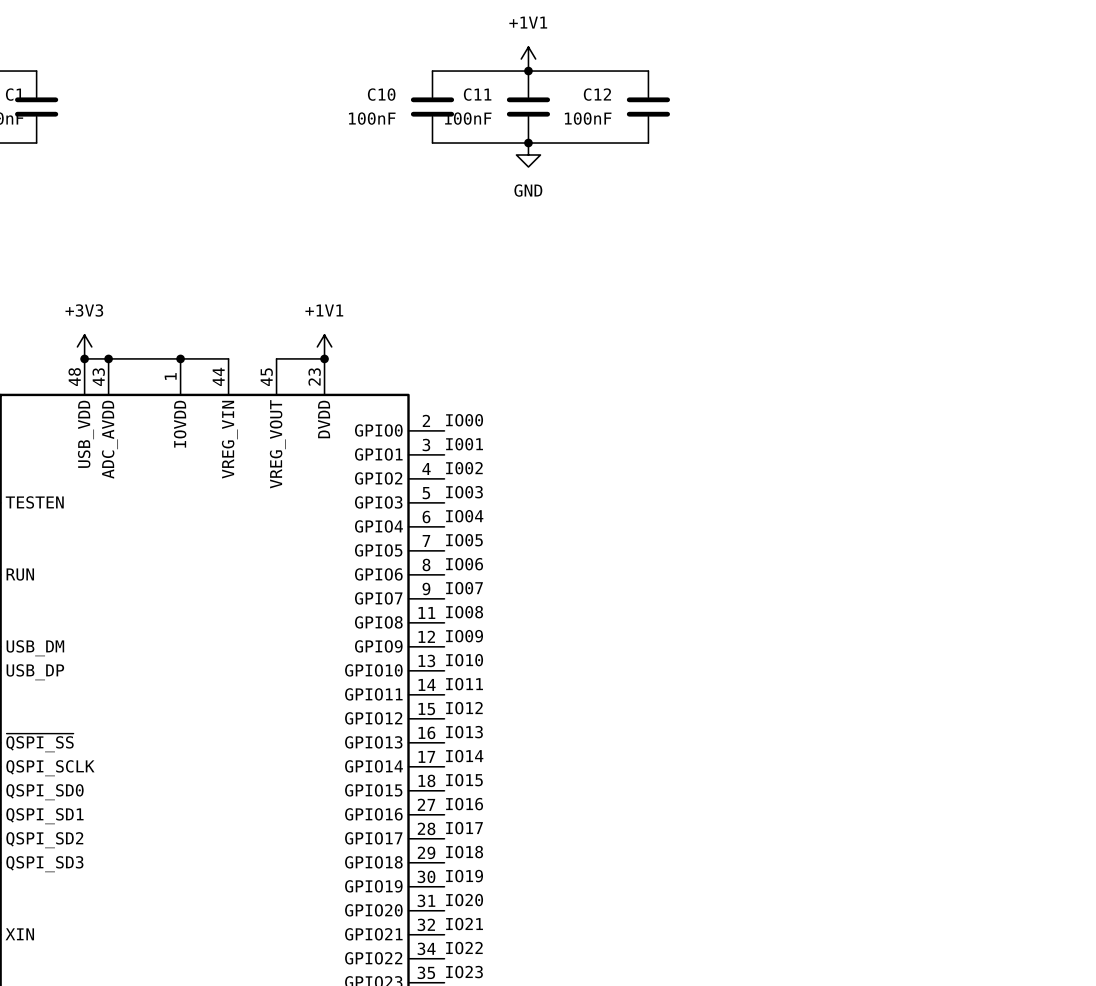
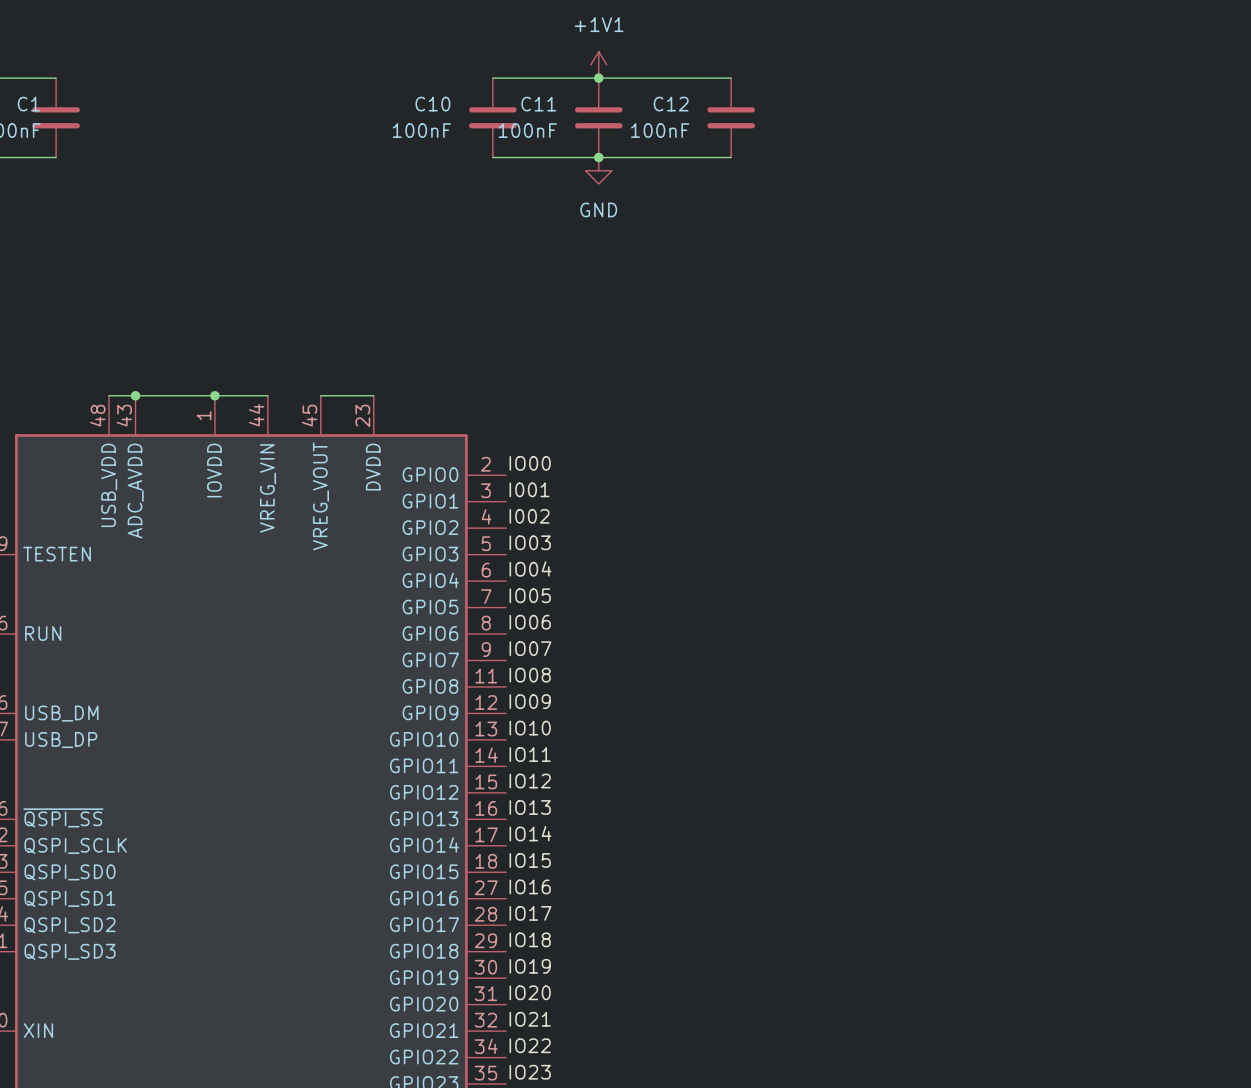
power symbol: +3V3 (84, 346) -> none
power symbol: +1V1 (324, 346) -> none
junction: (84, 358) -> none
junction: (324, 358) -> none

